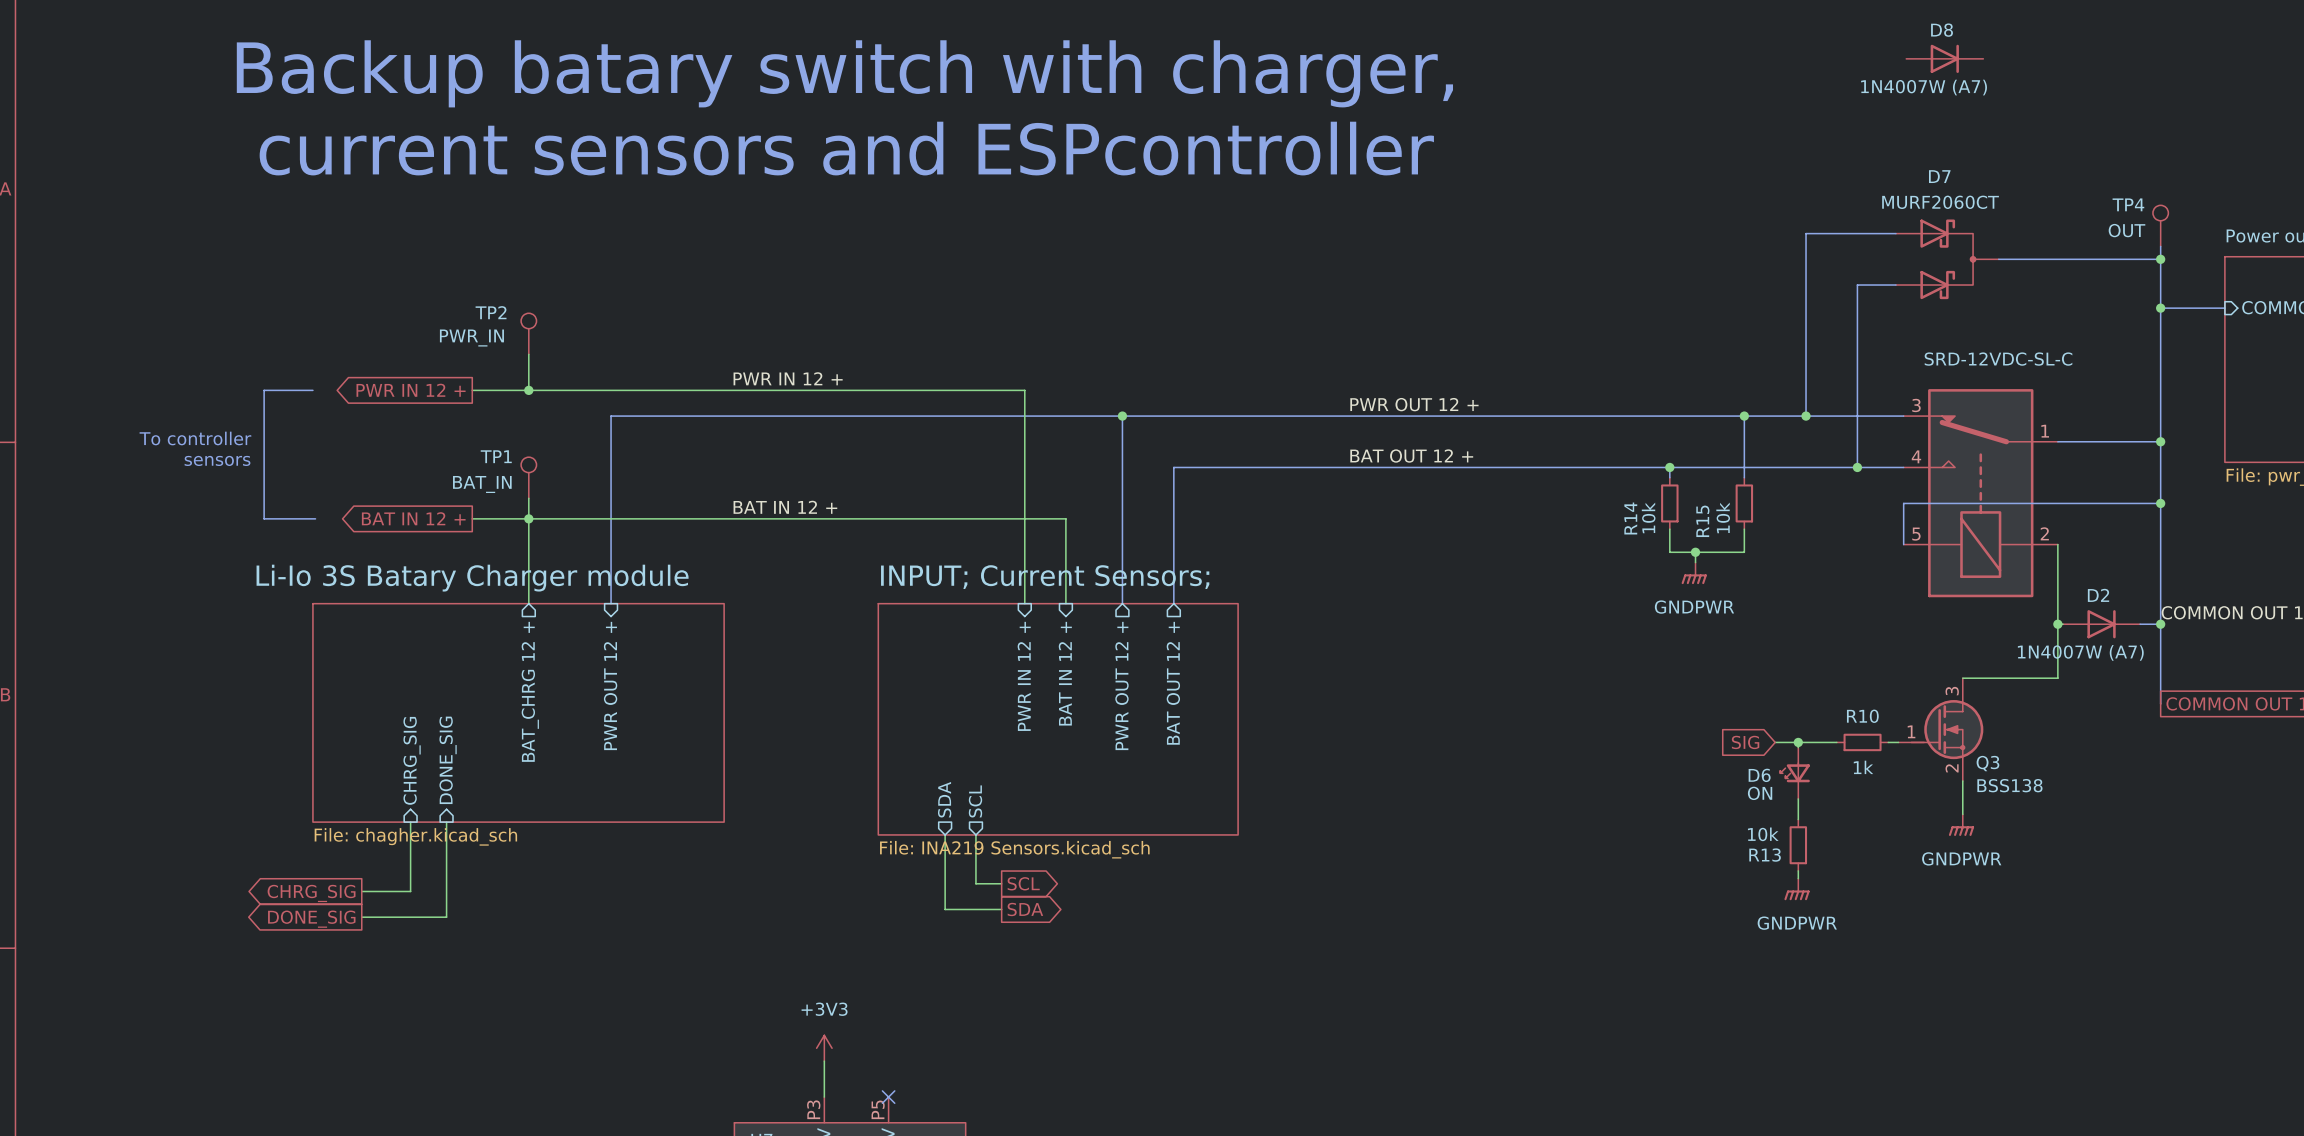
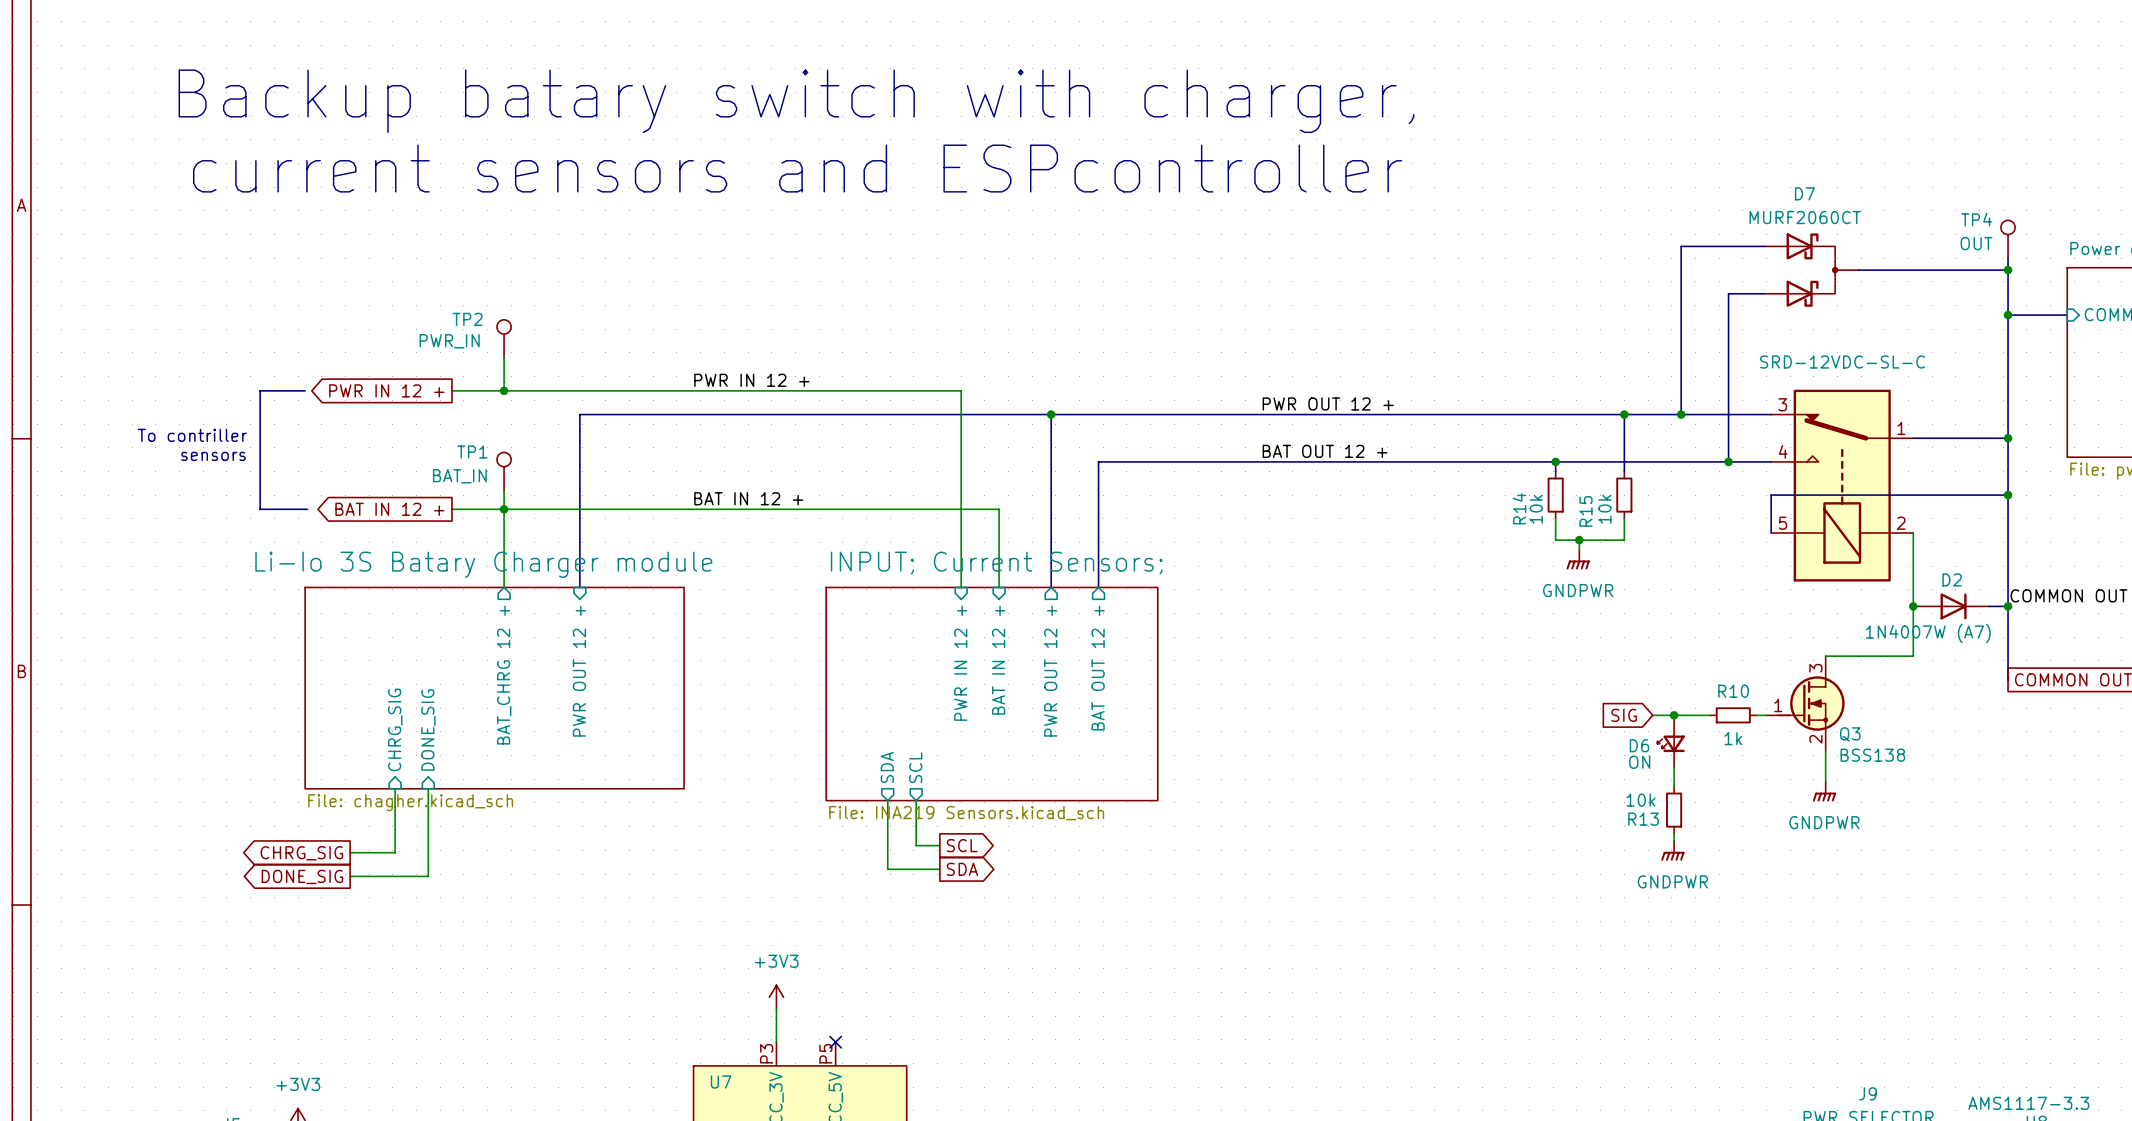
D8: 1N4007W (A7) (1944, 58) -> none
text: To controller (195, 438) -> To contriller (192, 435)

